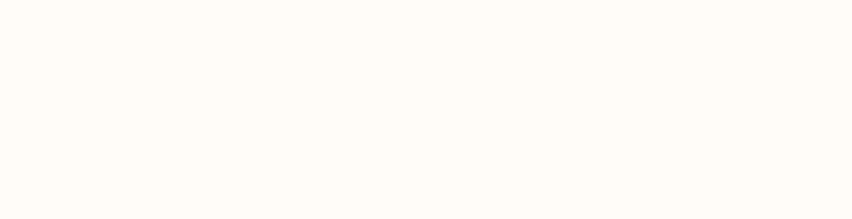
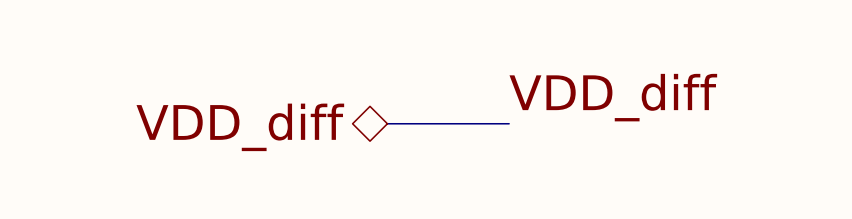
label: none -> VDD_diff (613, 97)
wire: none -> (387, 123) (509, 123)
hierarchical label: none -> VDD_diff (240, 127)

